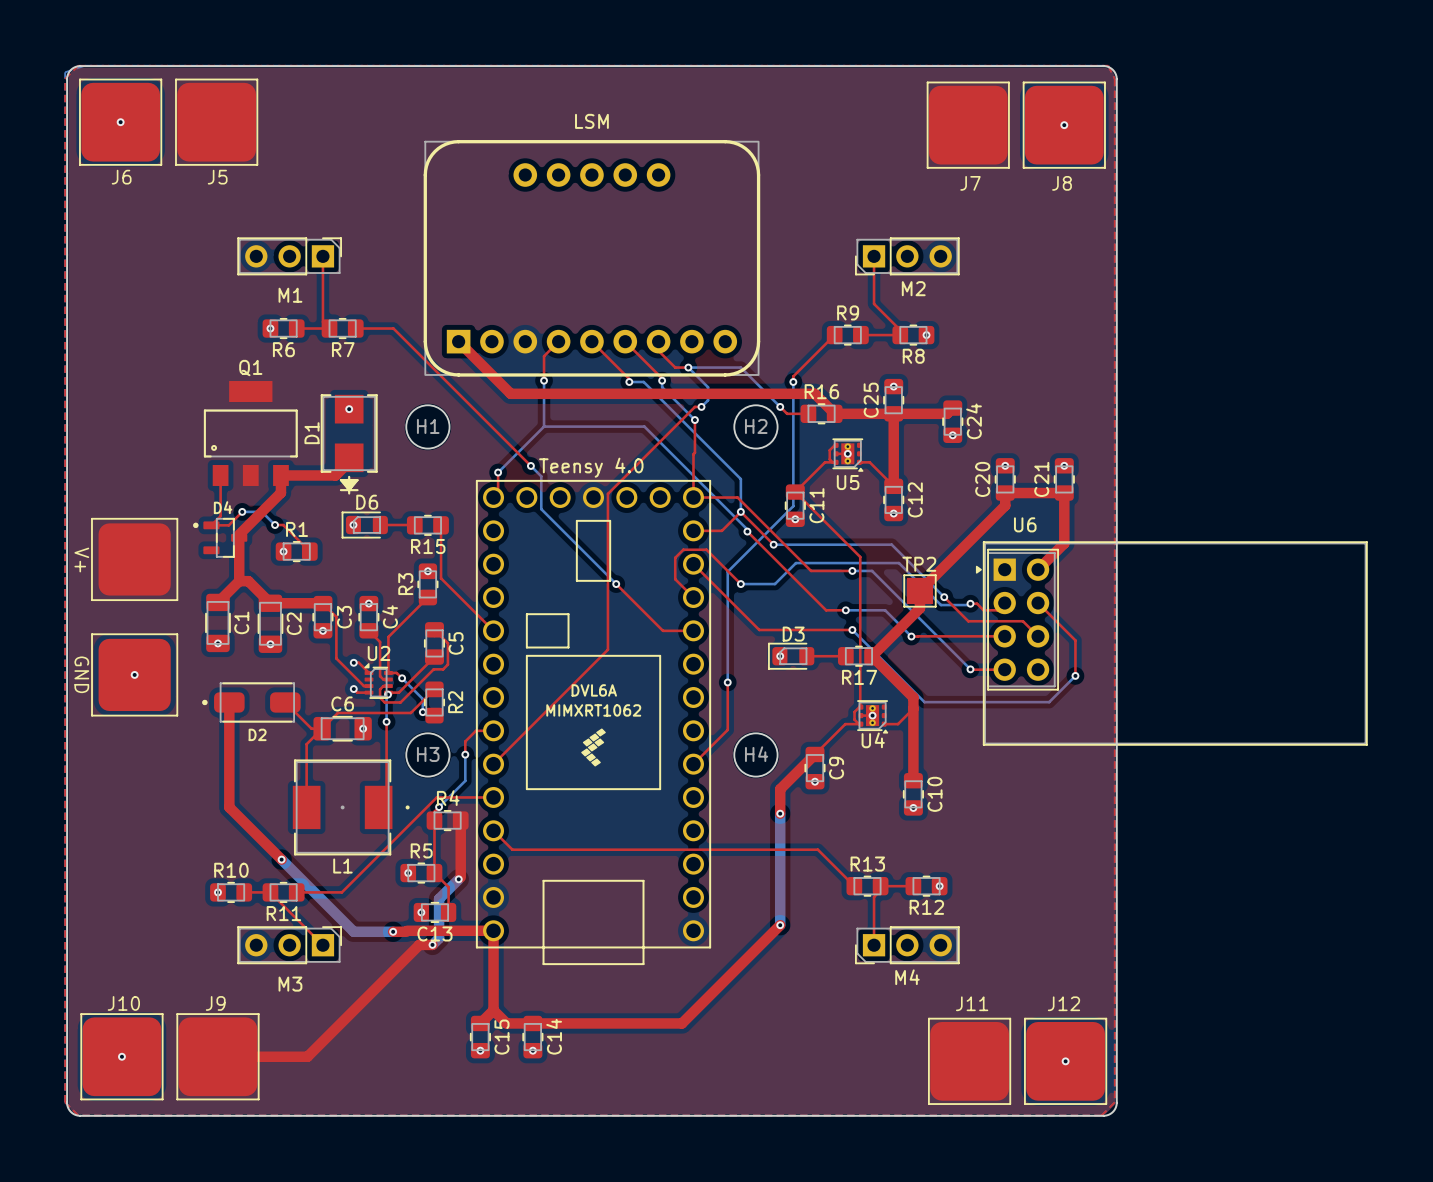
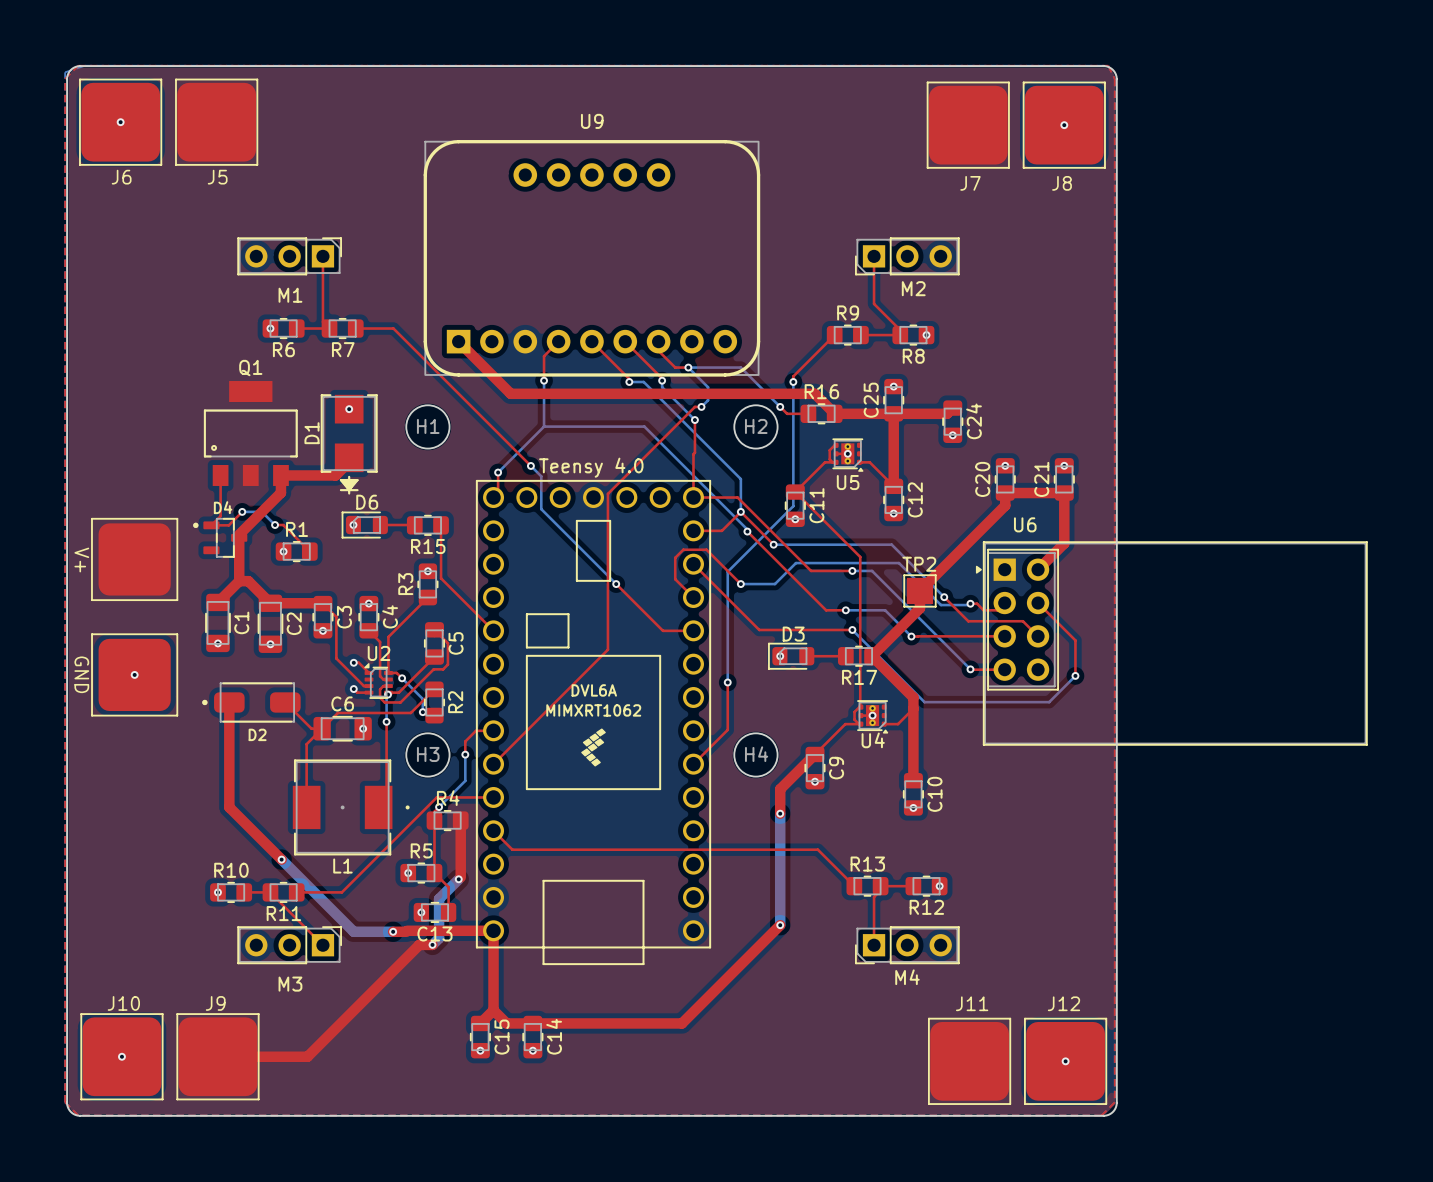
LSM name: LSM (591, 121) -> U9 (592, 121)

